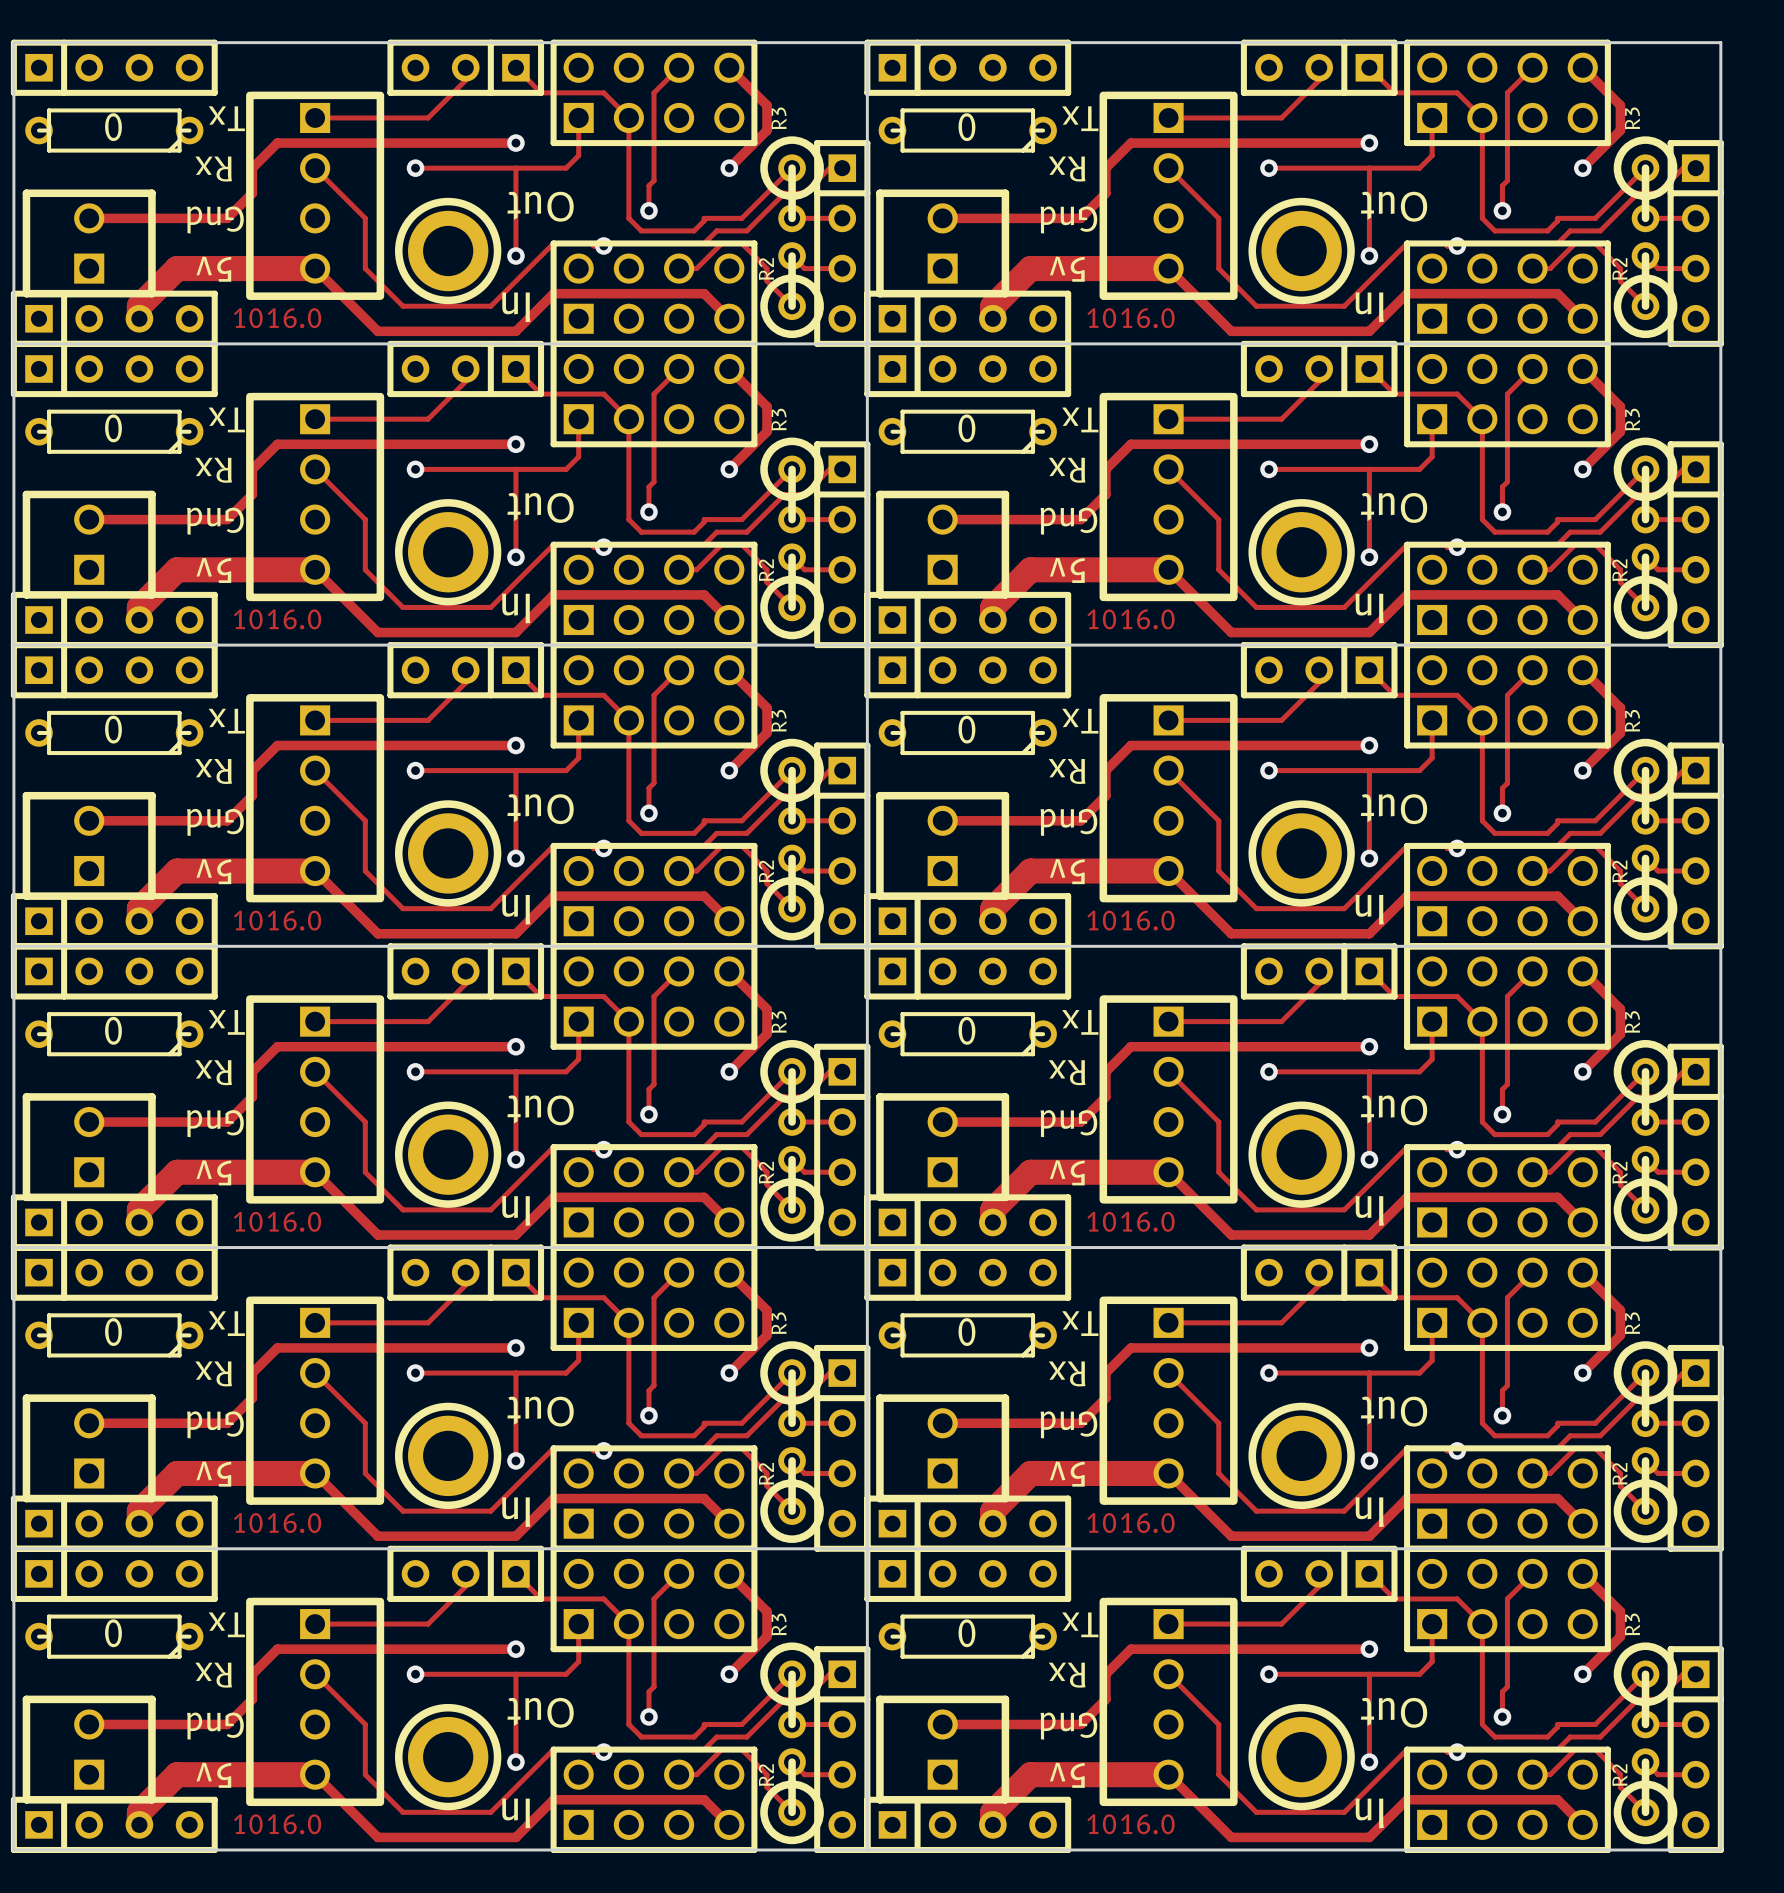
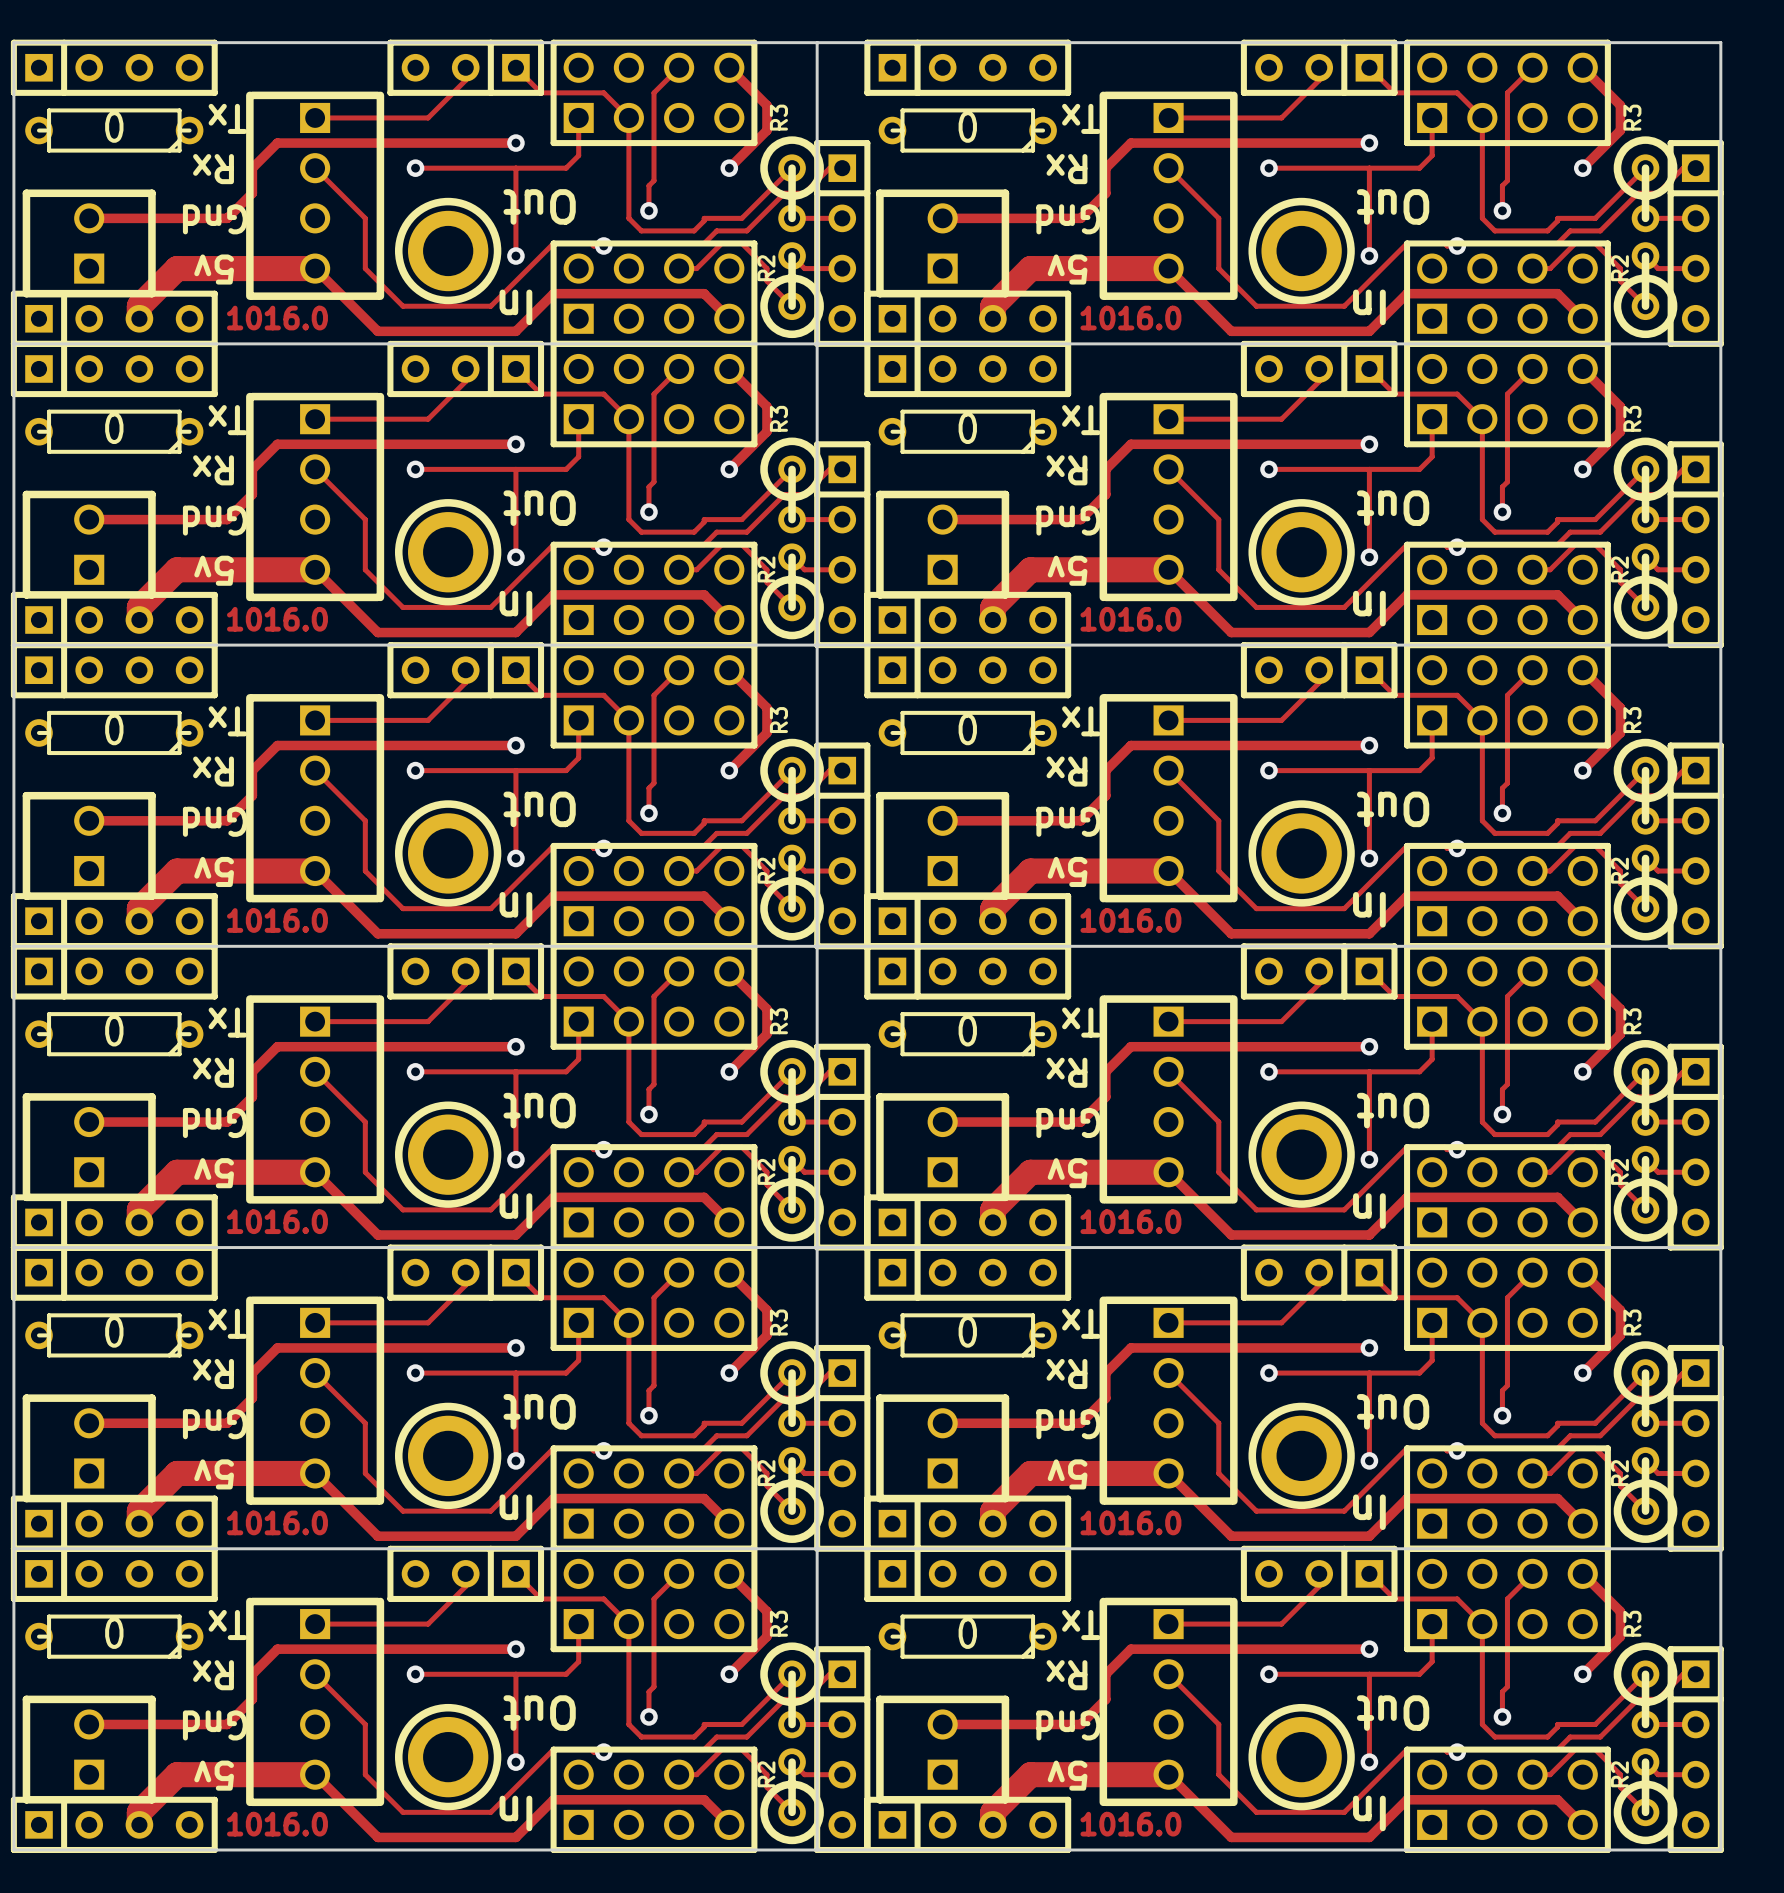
board edge: (867, 42) (867, 1849) -> (817, 42) (817, 1849)

